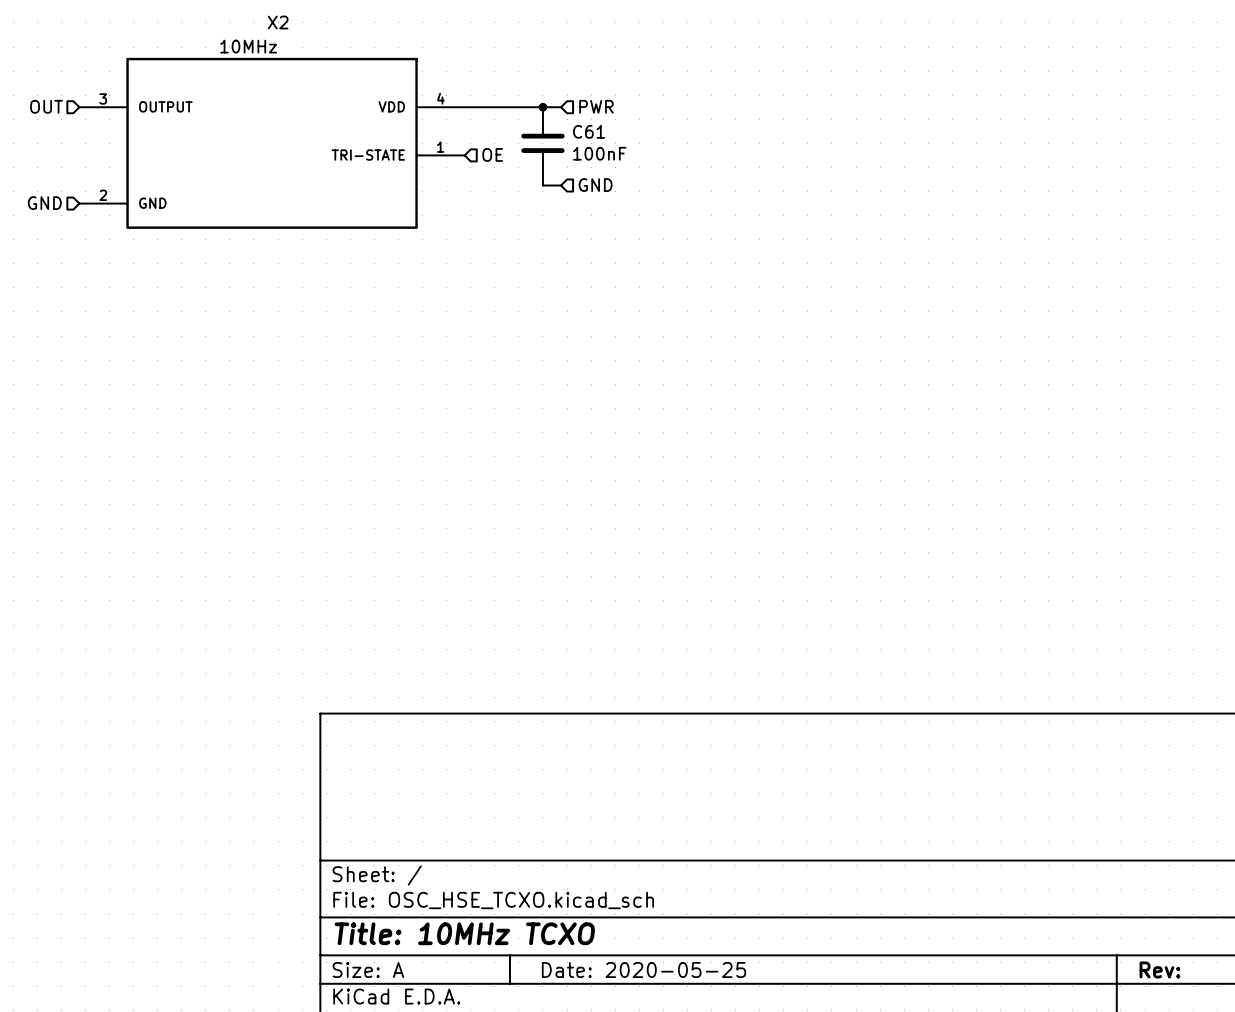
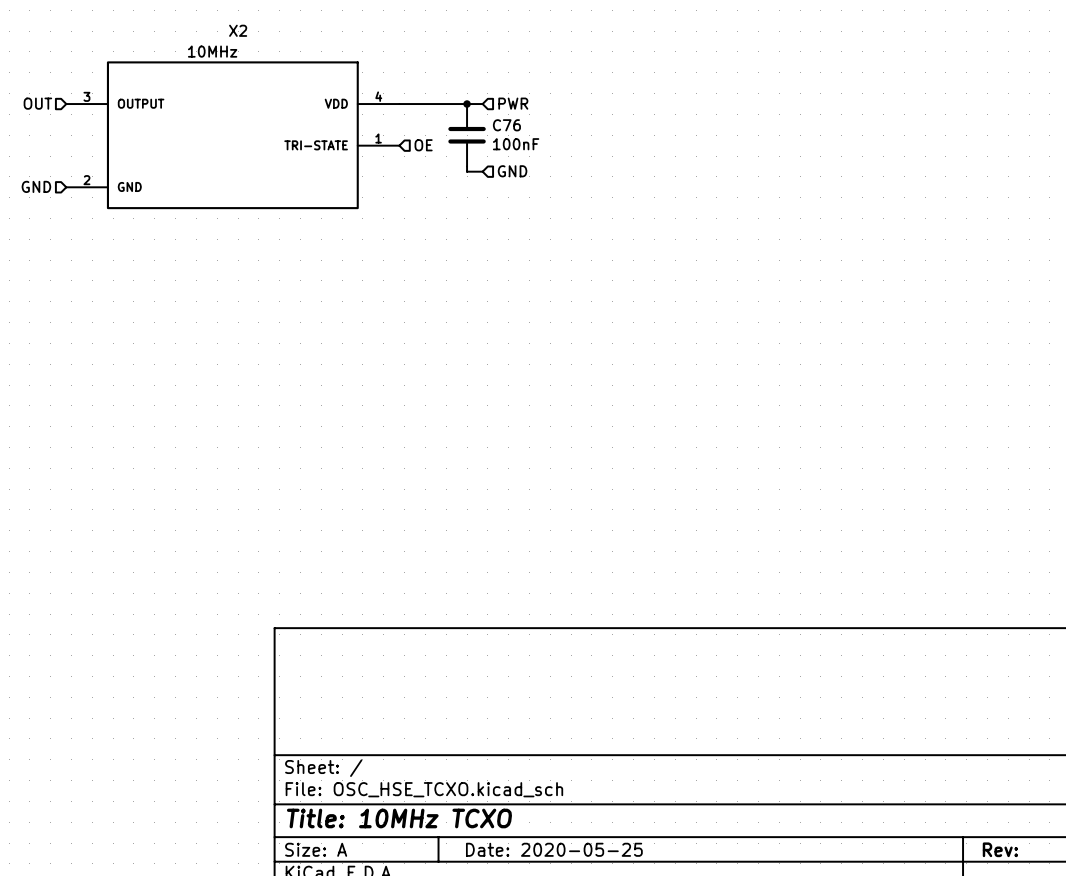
C61 name: C61 (589, 131) -> C76 (506, 125)

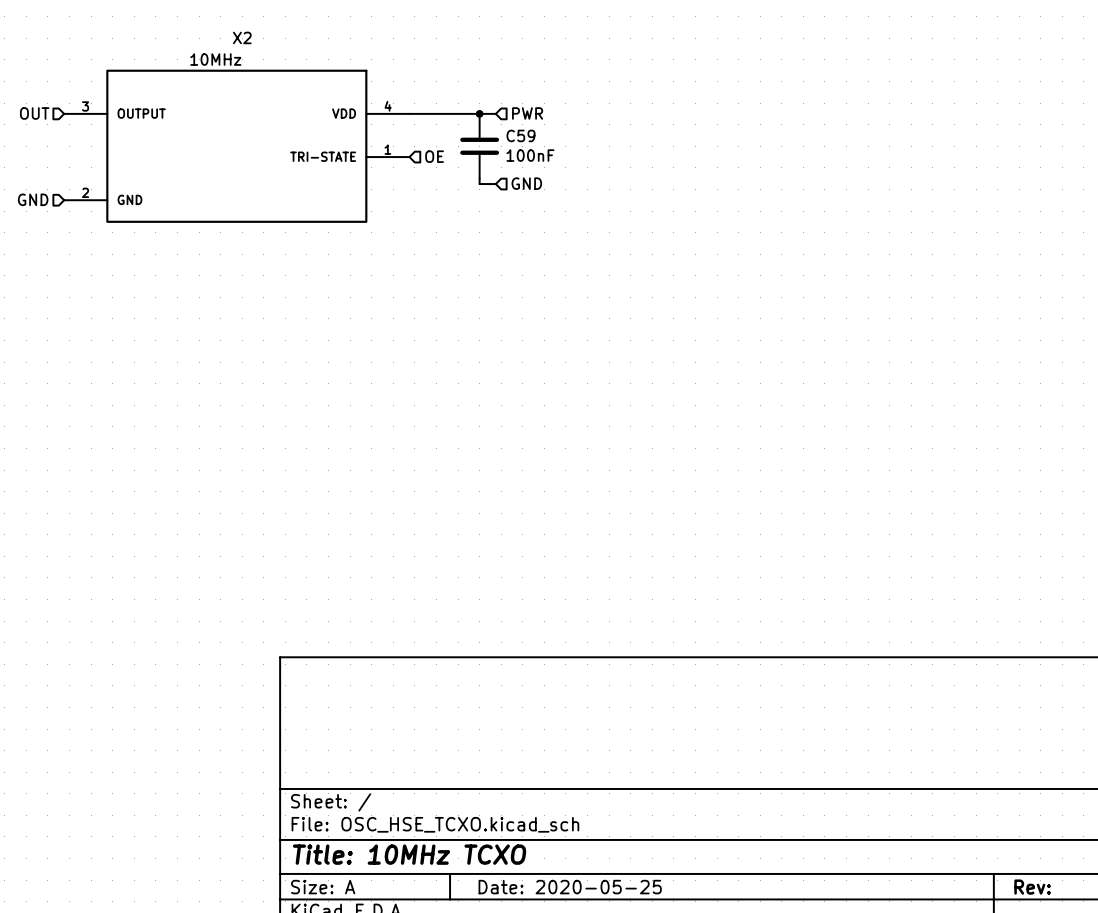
C76 name: C76 (506, 125) -> C59 (520, 135)

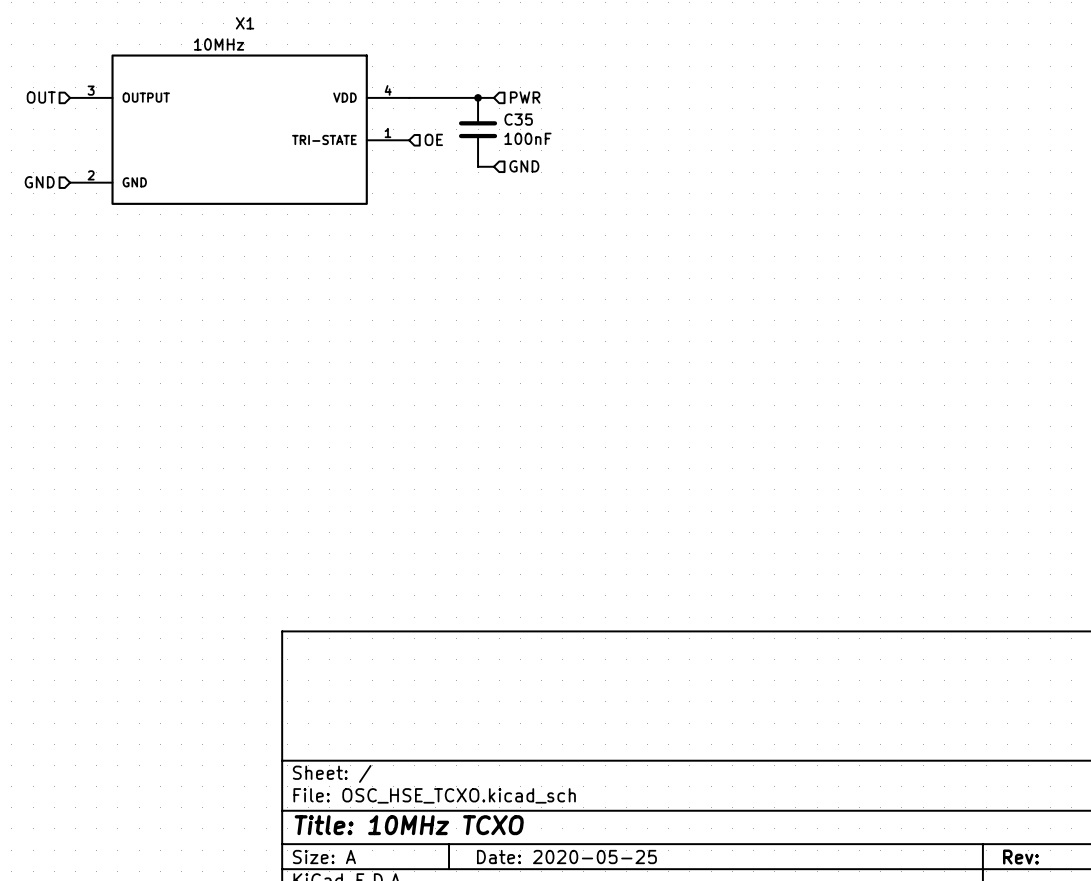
X2 name: X2 (242, 37) -> X1 (245, 23)
C59 name: C59 (520, 135) -> C35 (518, 119)

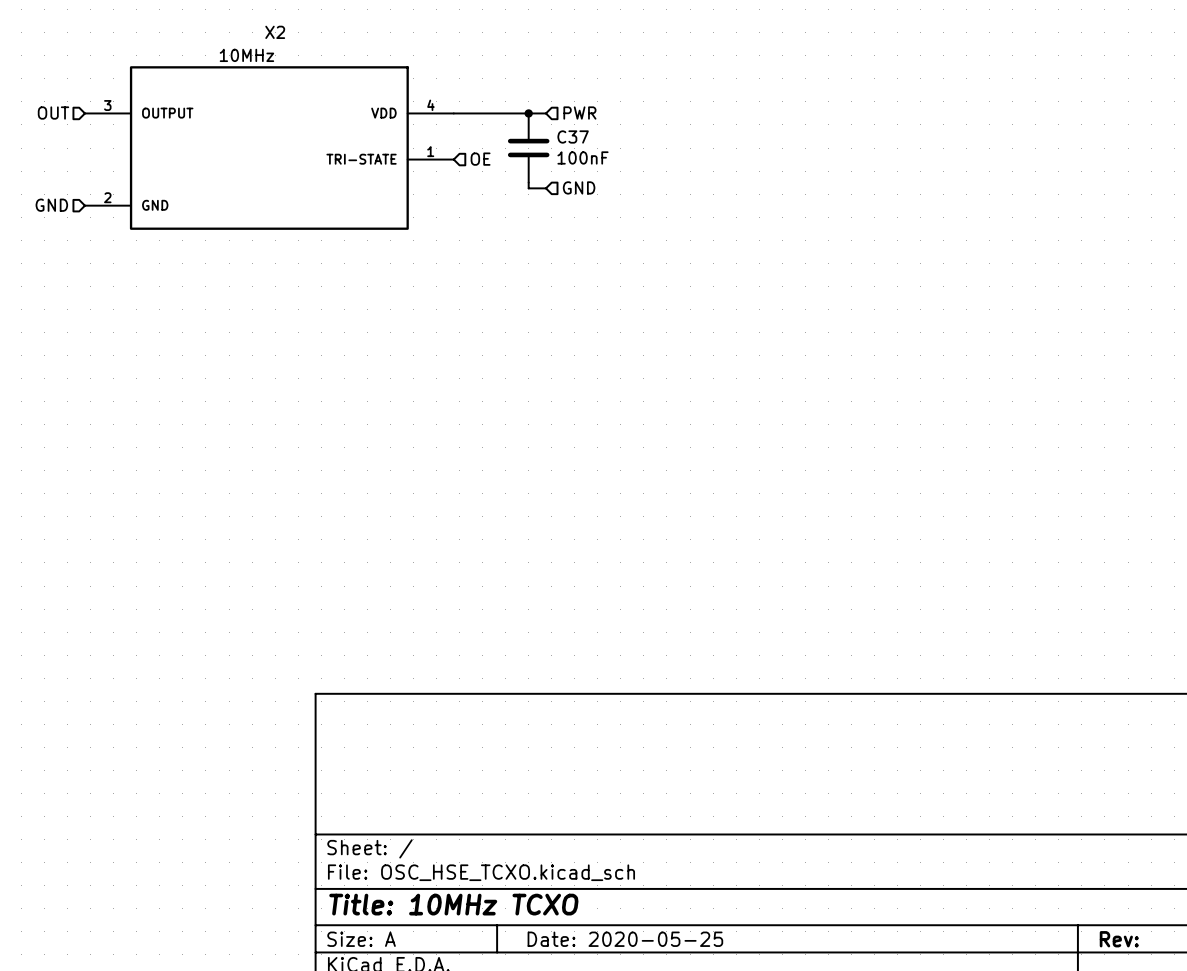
X1 name: X1 (245, 23) -> X2 (275, 32)
C35 name: C35 (518, 119) -> C37 (573, 136)

